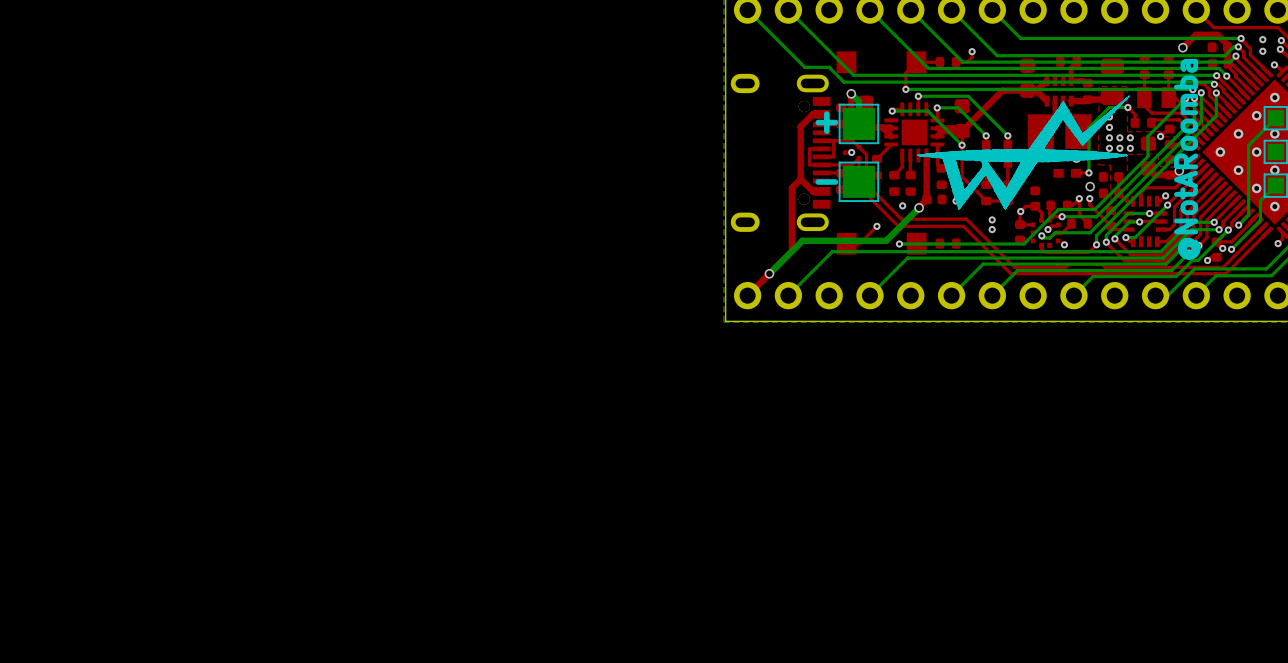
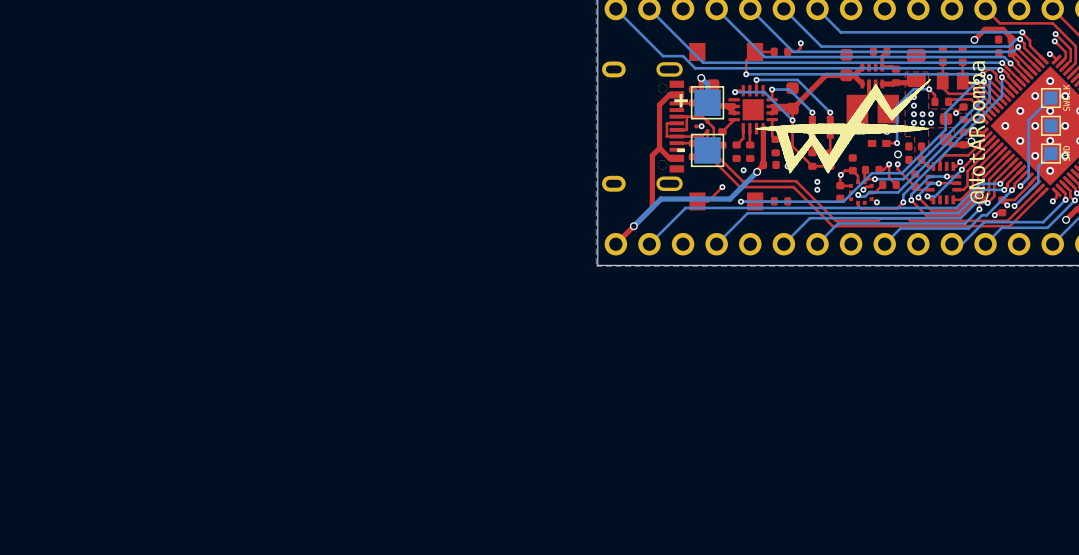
via: (1262, 39) -> none
via: (1262, 51) -> none

